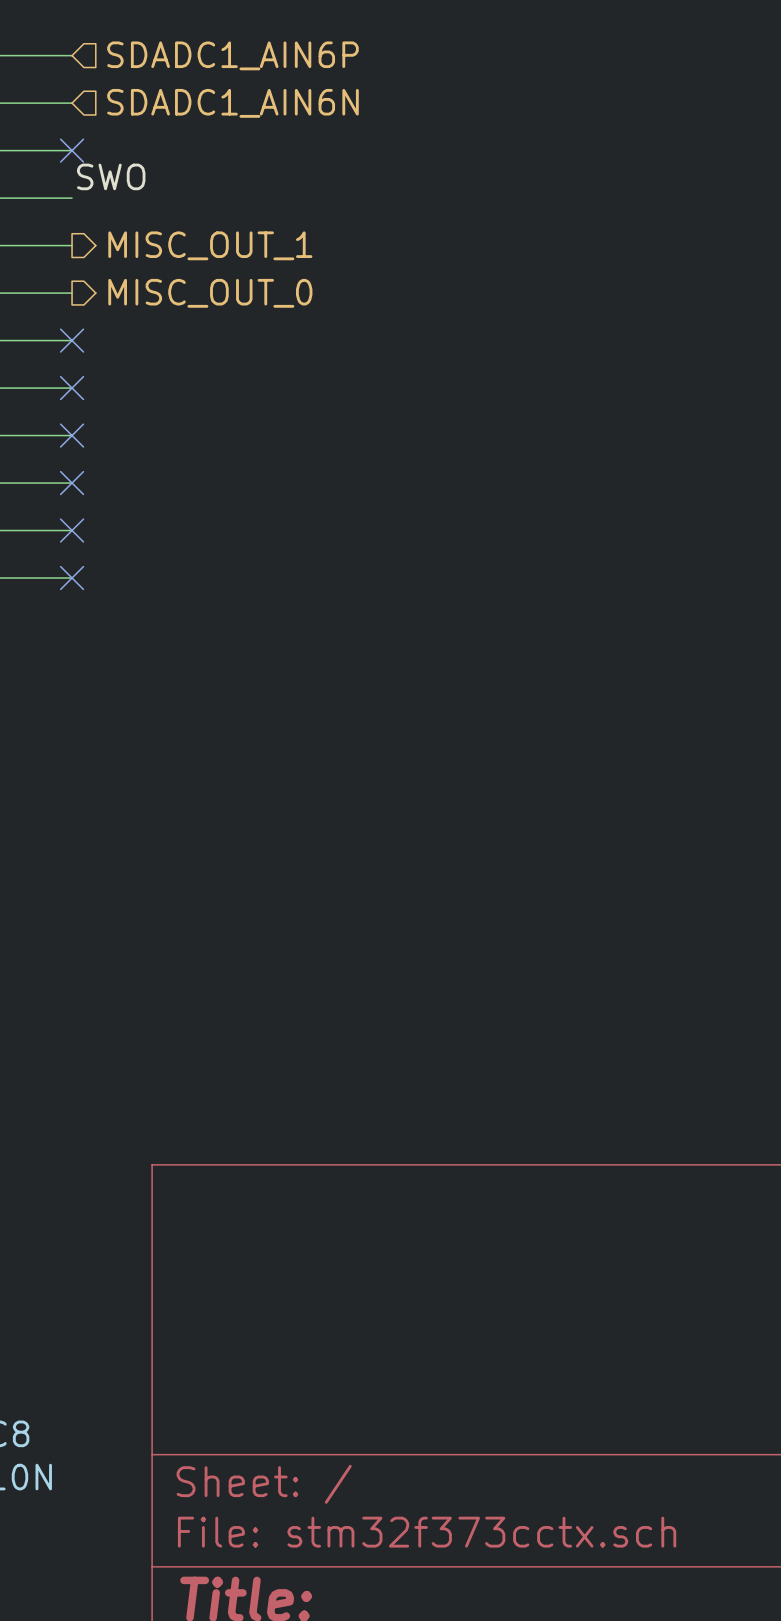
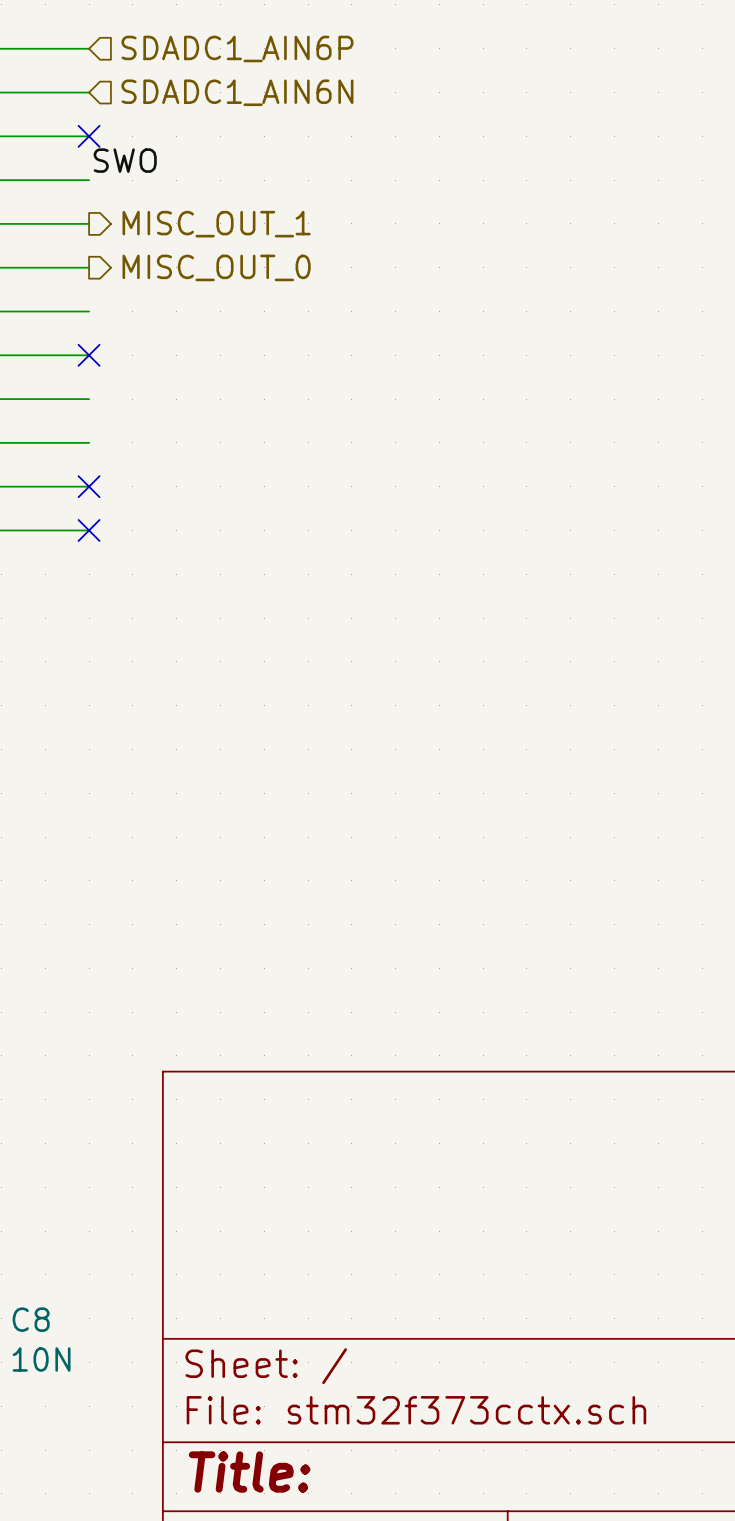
no-connect mark: (72, 340) -> none
no-connect mark: (72, 435) -> none
no-connect mark: (72, 483) -> none

